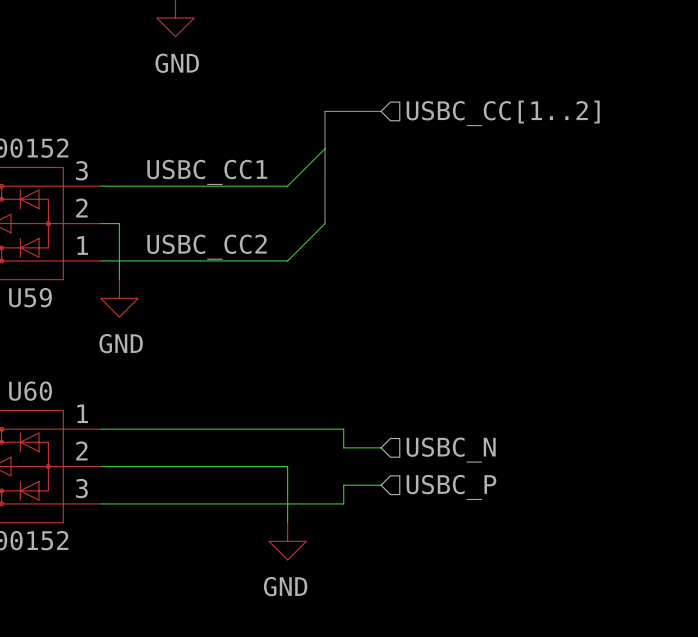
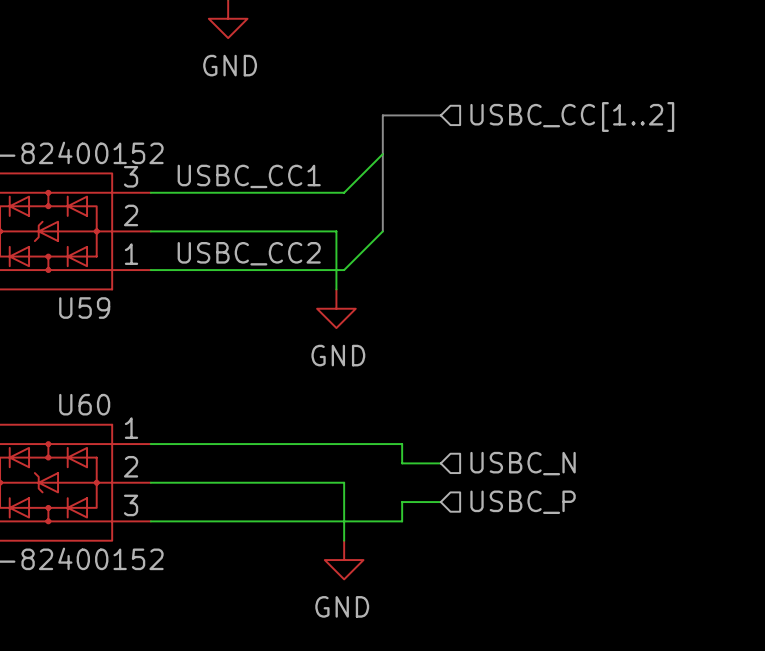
wire: (119, 223) (119, 279) -> (170, 231) (336, 231) (336, 289)
power symbol position: GND (119, 298) -> GND (336, 308)

